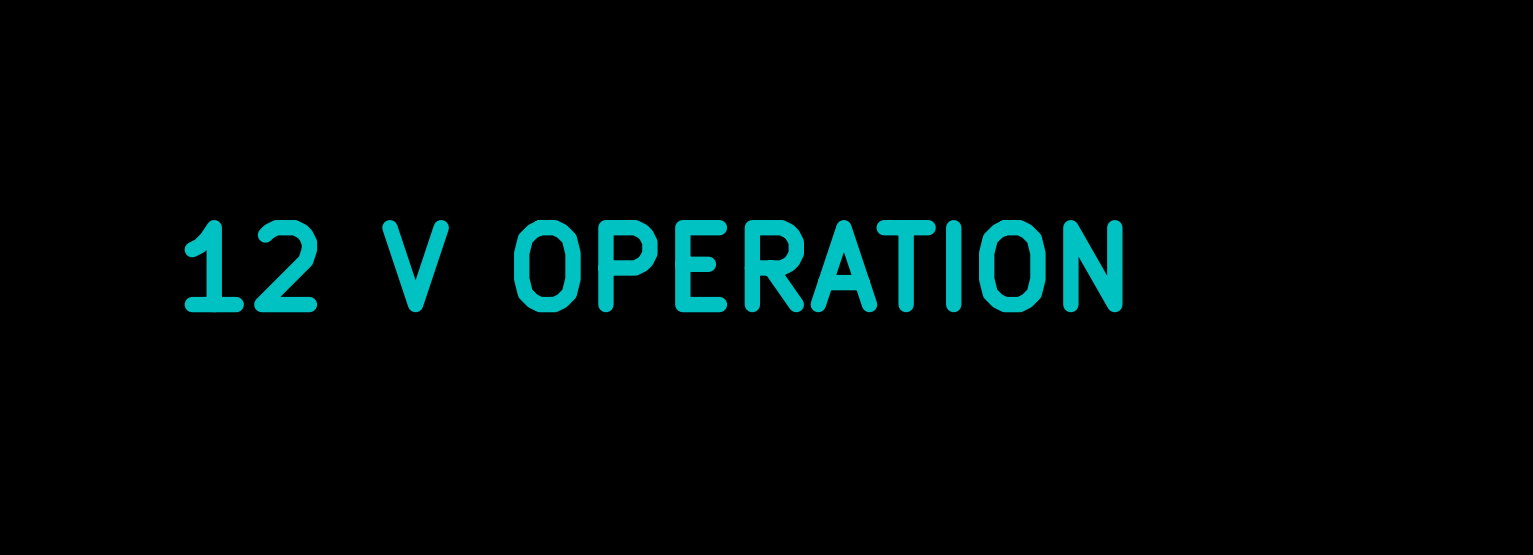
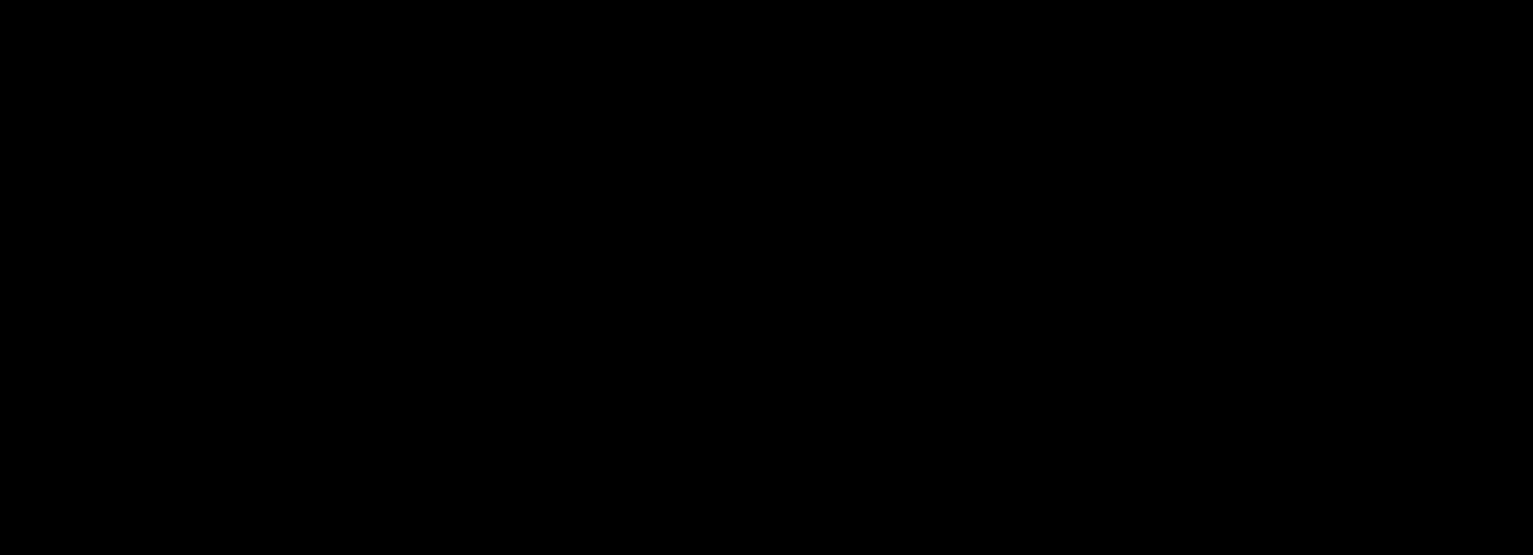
text: 12 V OPERATION (653, 266) -> none

